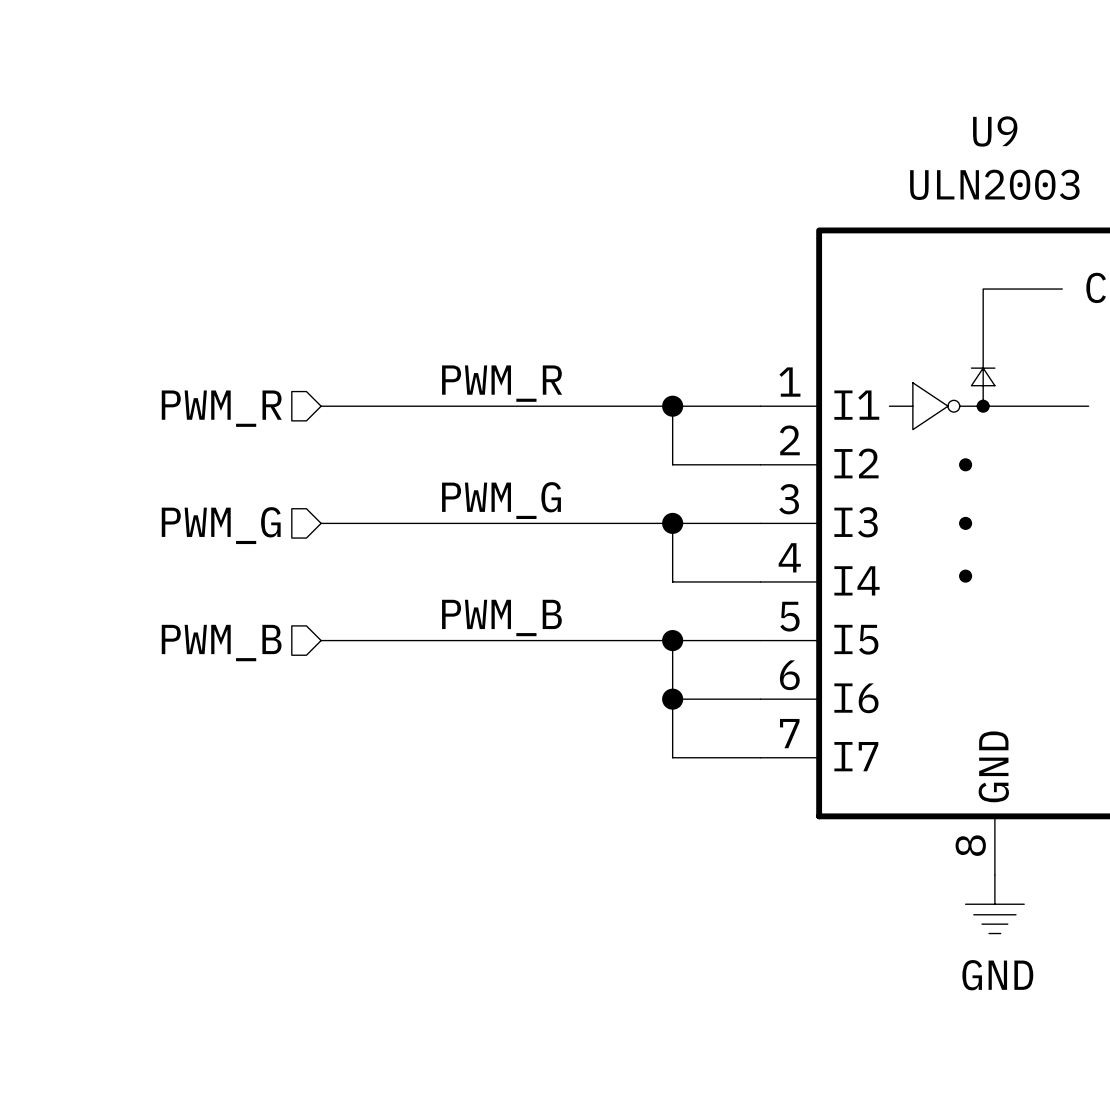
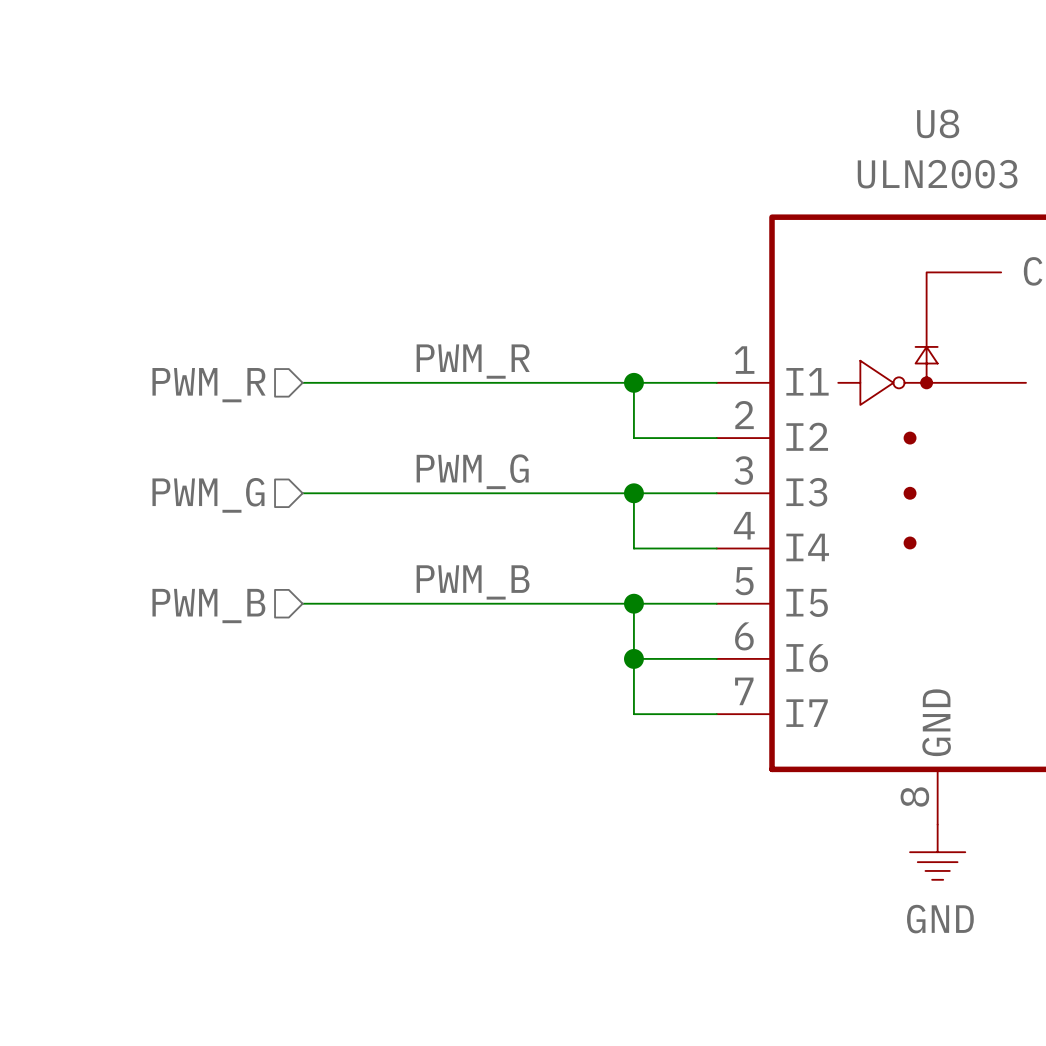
U9 name: U9 (995, 131) -> U8 (938, 123)

